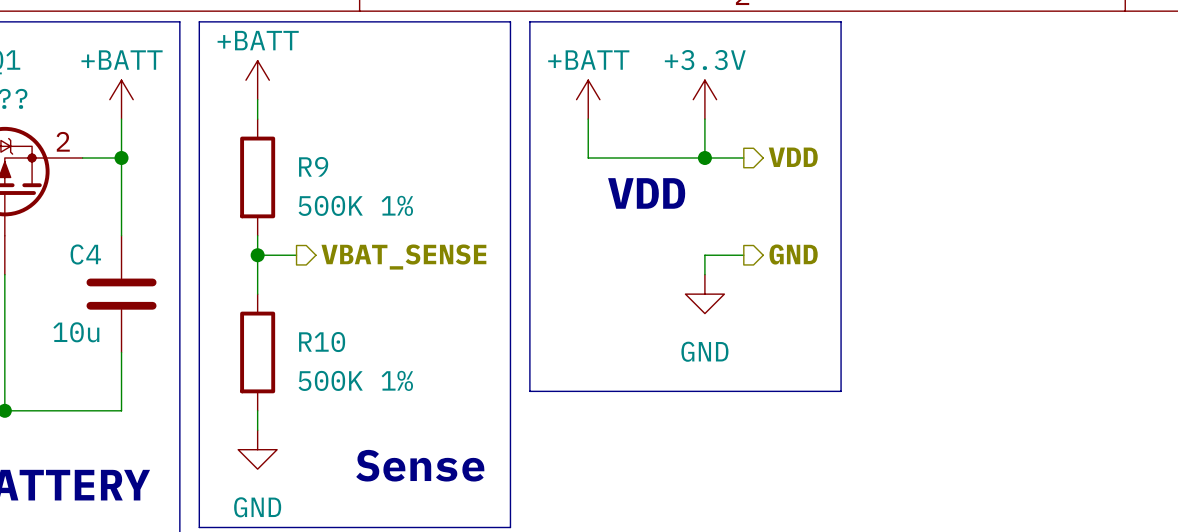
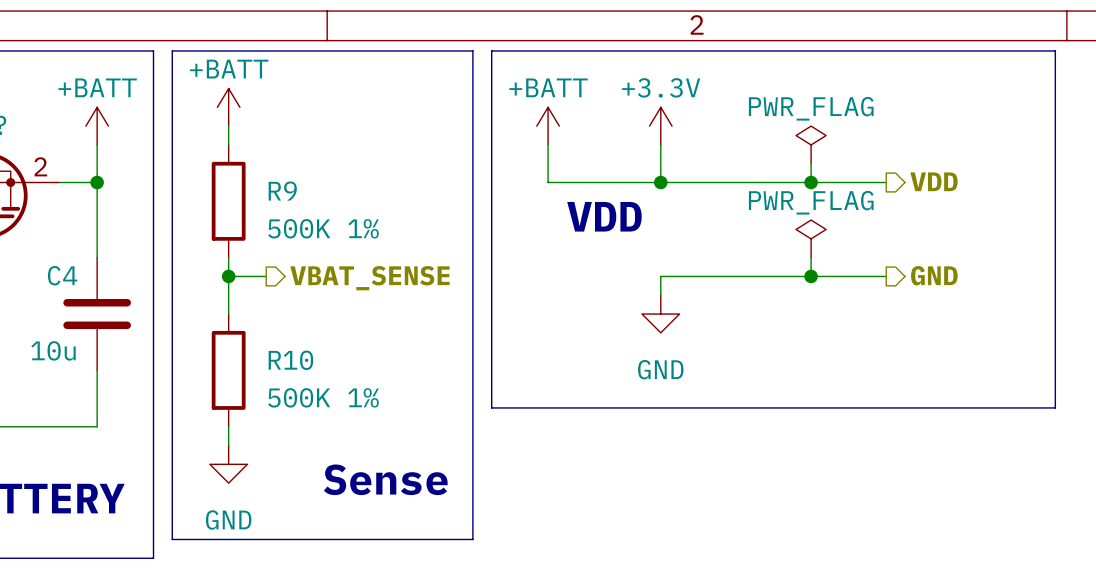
line: (841, 21) (841, 391) -> (792, 50) (1055, 50) (1055, 407) (792, 407)
power symbol: none -> PWR_FLAG (811, 144)
wire: none -> (811, 163) (811, 182)
hierarchical label position: VDD (793, 157) -> VDD (933, 181)
wire: none -> (698, 182) (886, 182)
junction: none -> (811, 182)
power symbol: none -> PWR_FLAG (811, 238)
wire: none -> (811, 257) (811, 276)
hierarchical label position: GND (793, 254) -> GND (934, 275)
wire: none -> (698, 276) (886, 276)
junction: none -> (811, 276)

